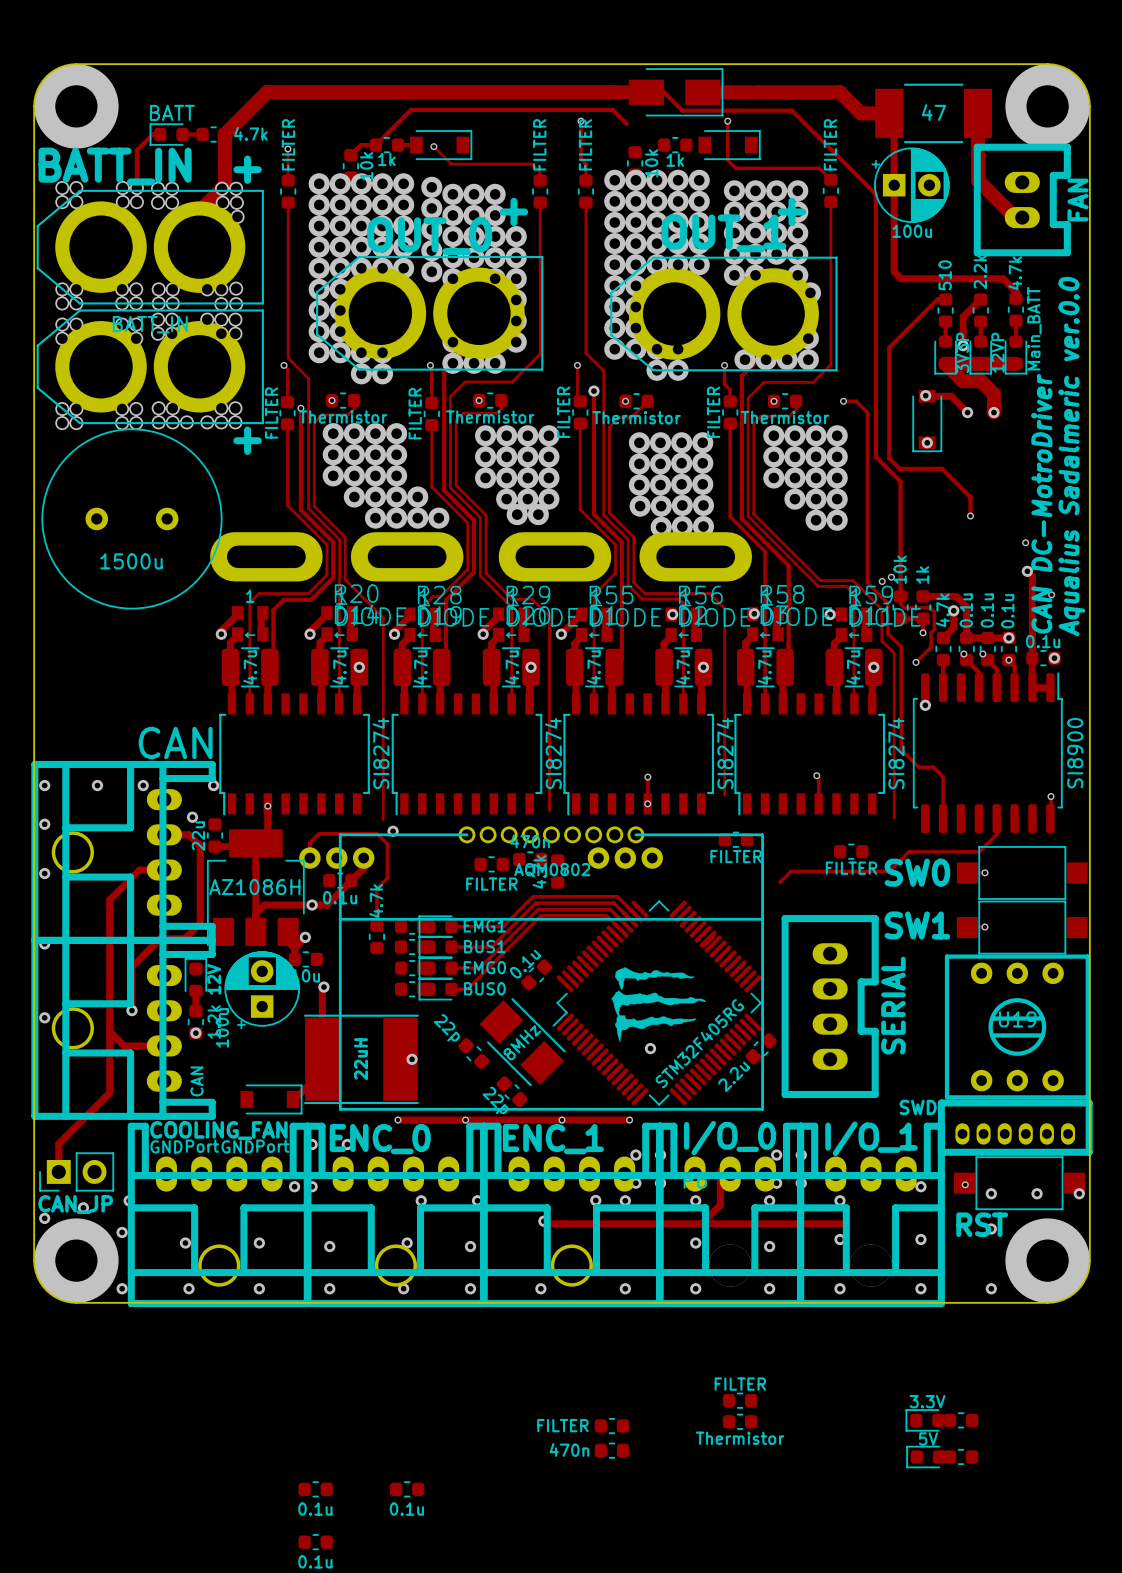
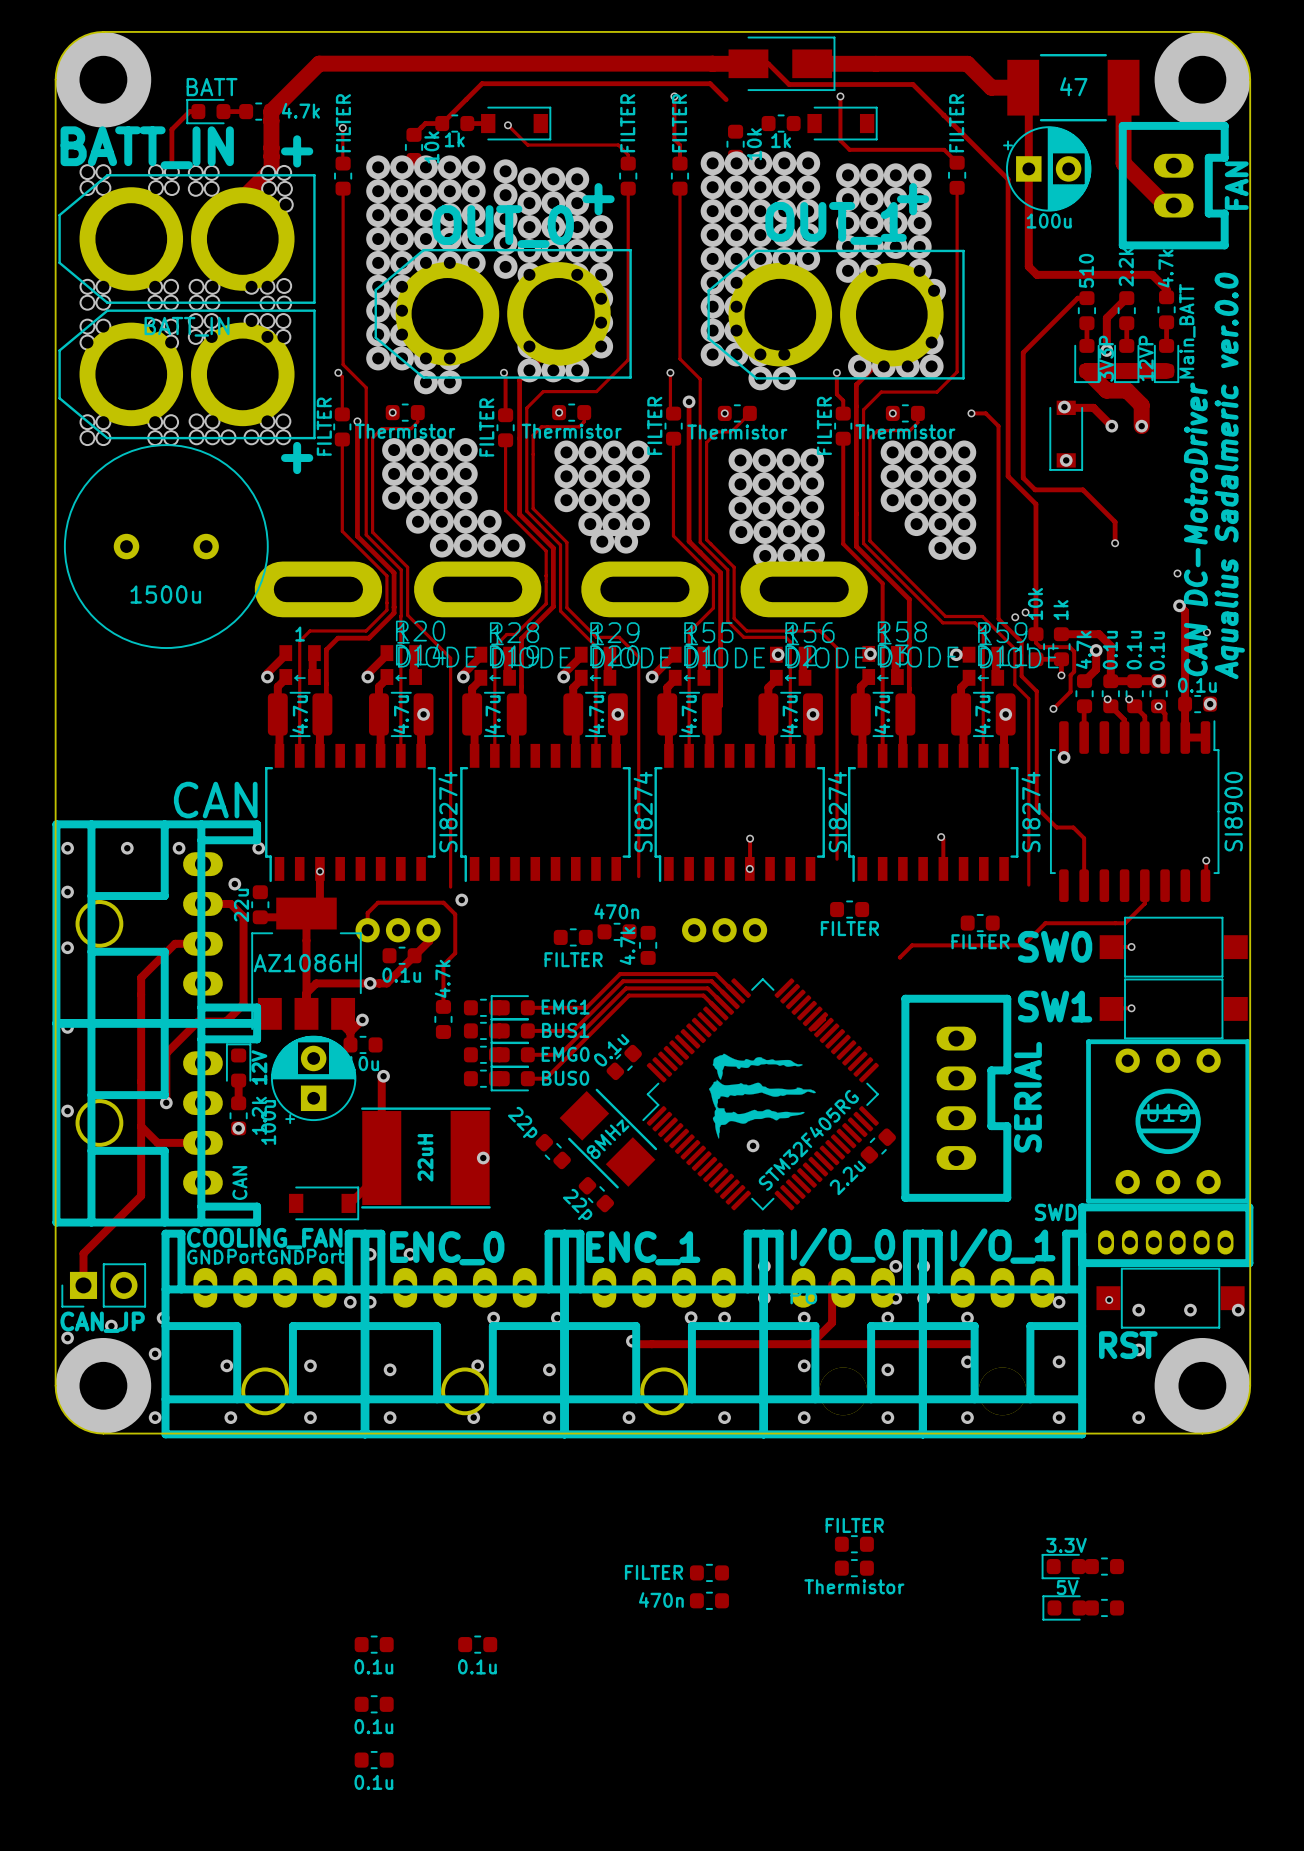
part: AQM0802 (551, 968) -> none
track: (398, 1120) (629, 1120) -> none
via: (398, 1120) -> none
via: (465, 1120) -> none
via: (562, 1120) -> none
via: (629, 1120) -> none
via: (635, 1155) -> none
via: (635, 1183) -> none

